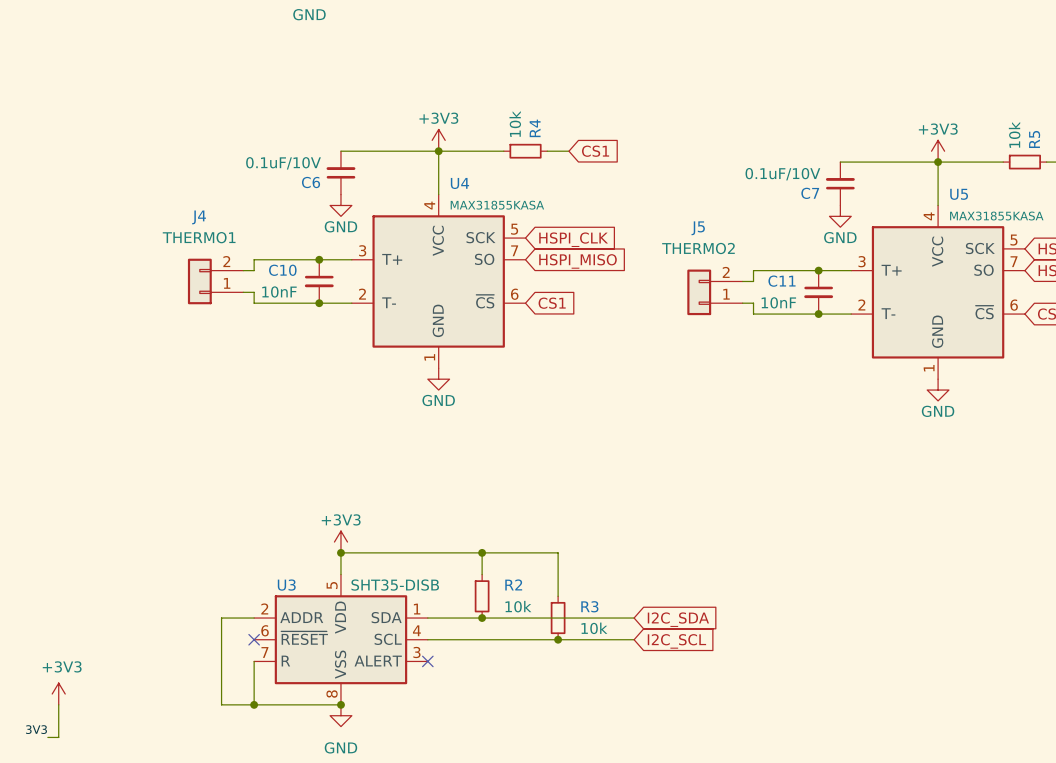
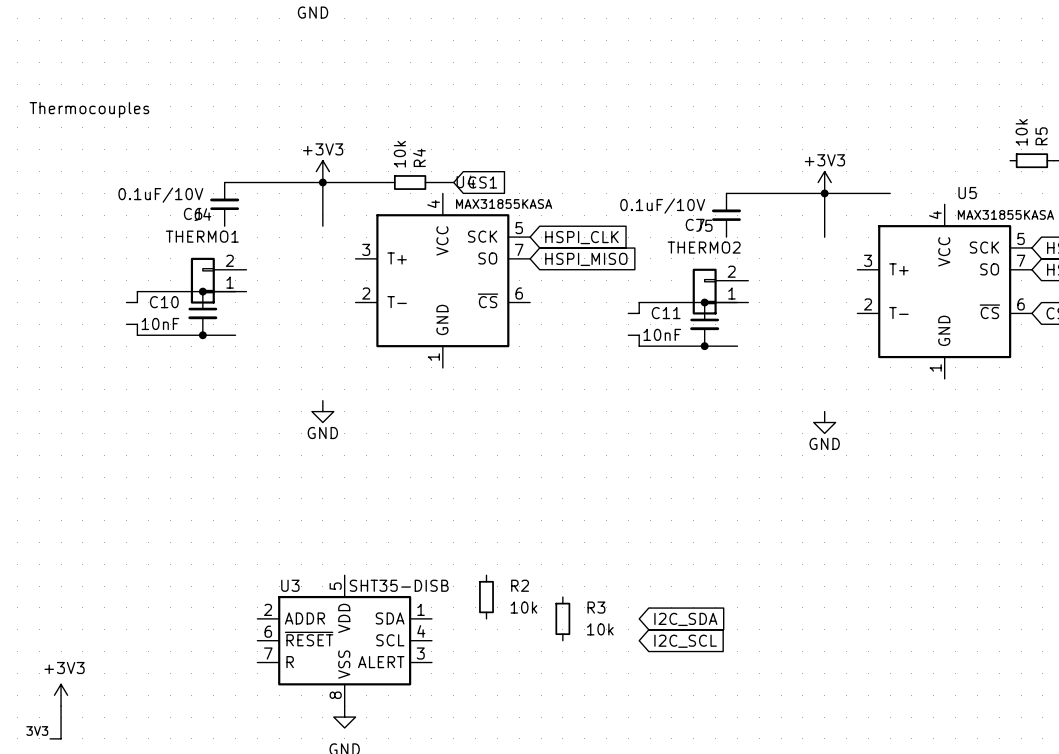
text: none -> Thermocouples (89, 109)
power symbol position: +3V3 (438, 140) -> +3V3 (322, 171)
wire: (340, 151) (503, 151) -> (224, 182) (388, 182)
wire: (438, 151) (438, 194) -> (322, 182) (322, 226)
junction: (438, 151) -> none
R4 position: (525, 151) -> (410, 182)
wire: (547, 151) (568, 151) -> (431, 182) (453, 182)
global label: CS1 (595, 151) -> none
power symbol position: +3V3 (938, 151) -> +3V3 (824, 182)
wire: (840, 162) (1003, 162) -> (726, 193) (890, 193)
wire: (938, 162) (938, 205) -> (824, 193) (824, 237)
junction: (938, 162) -> none
C6 position: (340, 172) -> (224, 204)
junction: none -> (322, 182)
global label: none -> CS1 (482, 182)
C7 position: (840, 183) -> (726, 215)
junction: none -> (824, 193)
power symbol: GND (340, 205) -> none
power symbol: GND (840, 216) -> none
junction: (319, 259) -> none
wire: (351, 259) (254, 259) (254, 270) (243, 270) -> (235, 291) (137, 291) (137, 302) (126, 302)
junction: (818, 270) -> none
wire: (851, 270) (753, 270) (753, 281) (742, 281) -> (737, 302) (639, 302) (639, 313) (628, 313)
C10 position: (319, 281) -> (202, 313)
junction: none -> (202, 291)
wire: (243, 292) (254, 292) (254, 303) (351, 303) -> (126, 324) (137, 324) (137, 335) (235, 335)
C11 position: (818, 292) -> (704, 324)
junction: (319, 303) -> none
global label: CS1 (552, 303) -> none
junction: none -> (704, 302)
wire: (742, 303) (753, 303) (753, 314) (851, 314) -> (628, 335) (639, 335) (639, 346) (737, 346)
junction: (818, 314) -> none
junction: none -> (202, 335)
junction: none -> (704, 346)
power symbol: GND (438, 379) -> none
power symbol: GND (938, 390) -> none
power symbol: none -> GND (322, 411)
power symbol: none -> GND (824, 422)
power symbol: +3V3 (340, 542) -> none
junction: (340, 552) -> none
wire: (482, 552) (482, 574) -> none
junction: (482, 552) -> none
wire: (340, 574) (340, 552) (558, 552) (558, 596) -> none
wire: (254, 618) (221, 618) (221, 704) (340, 704) -> none
wire: (427, 618) (634, 618) -> none
junction: (482, 618) -> none
no-connect mark: (254, 639) -> none
wire: (427, 639) (634, 639) -> none
junction: (558, 639) -> none
wire: (254, 661) (254, 704) -> none
no-connect mark: (427, 661) -> none
junction: (254, 704) -> none
junction: (340, 704) -> none

